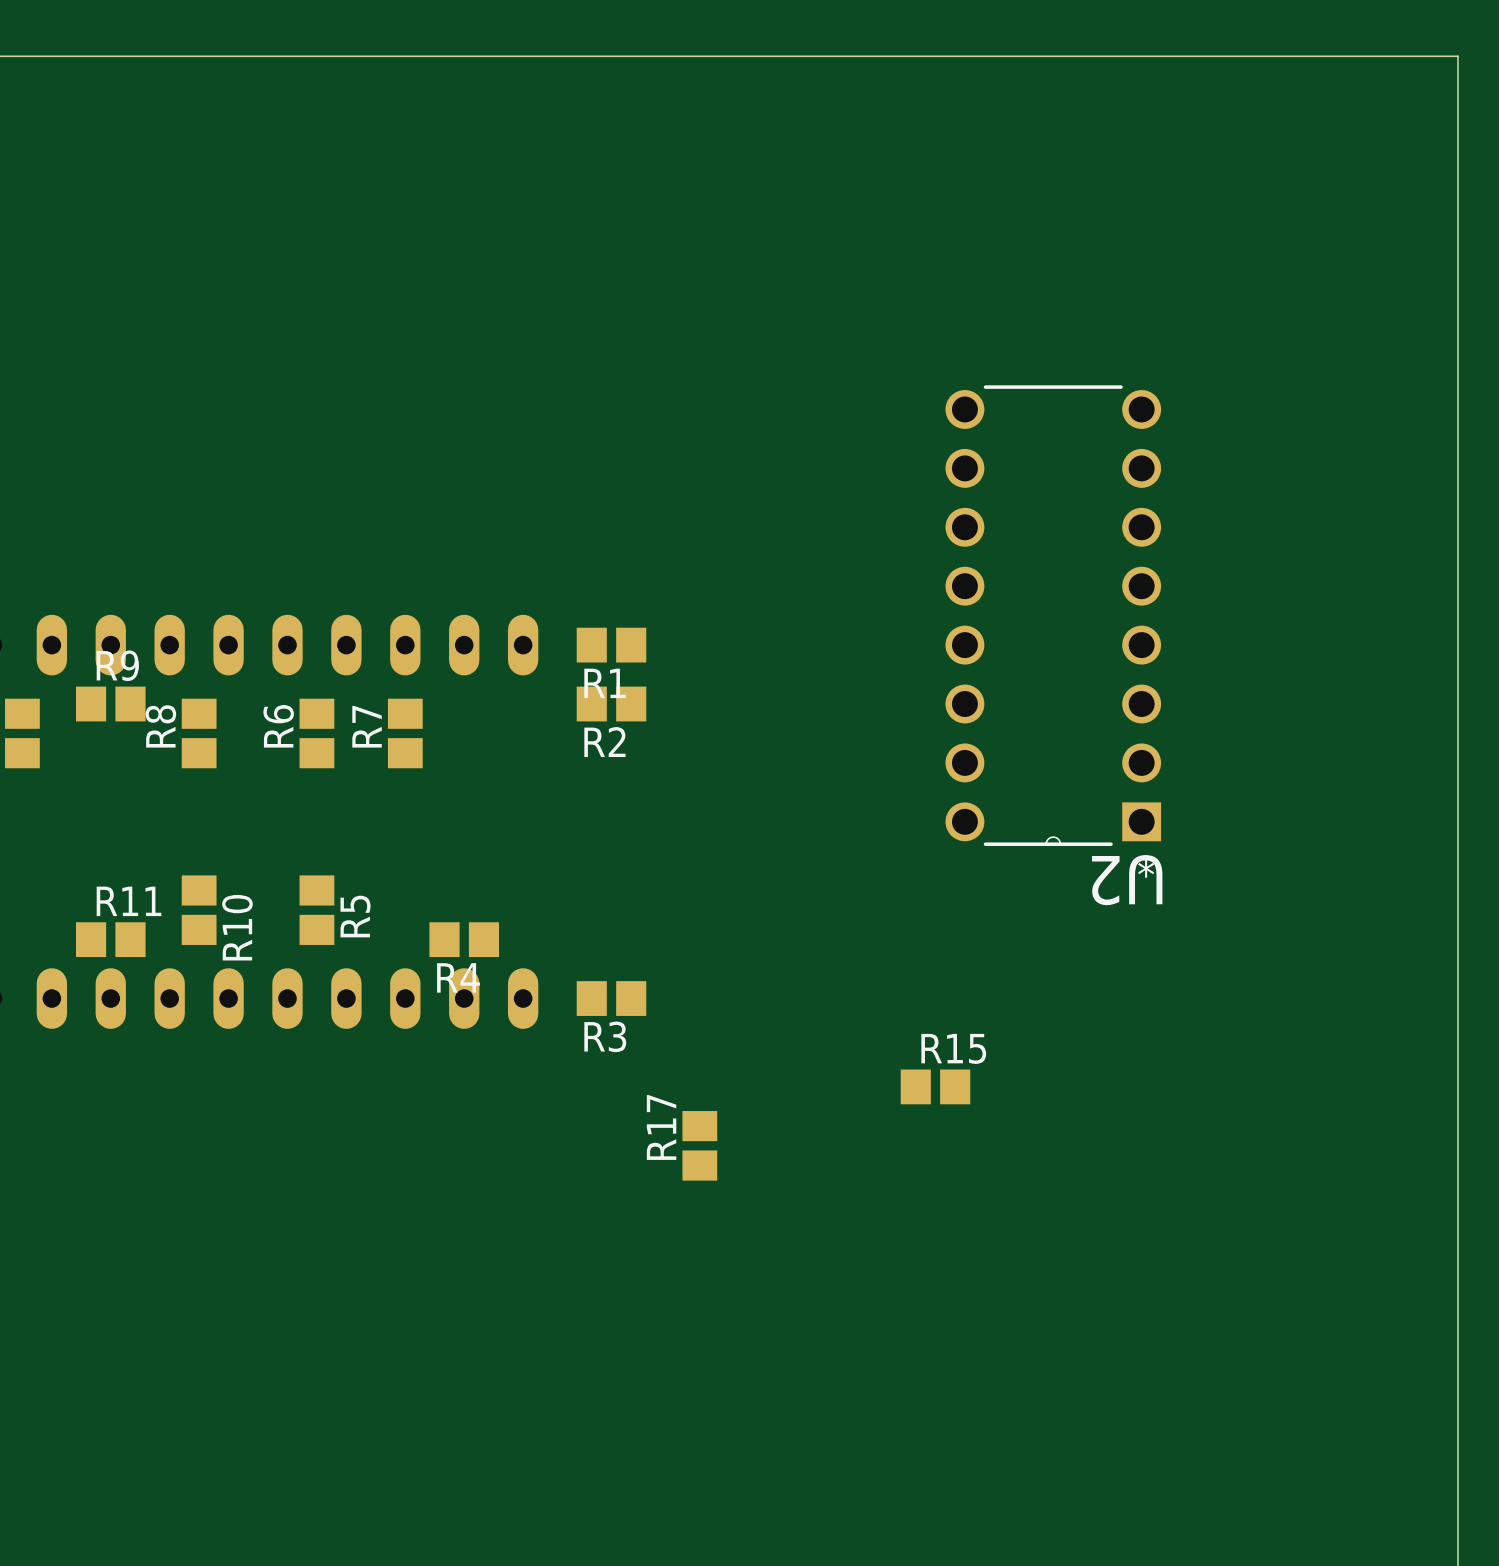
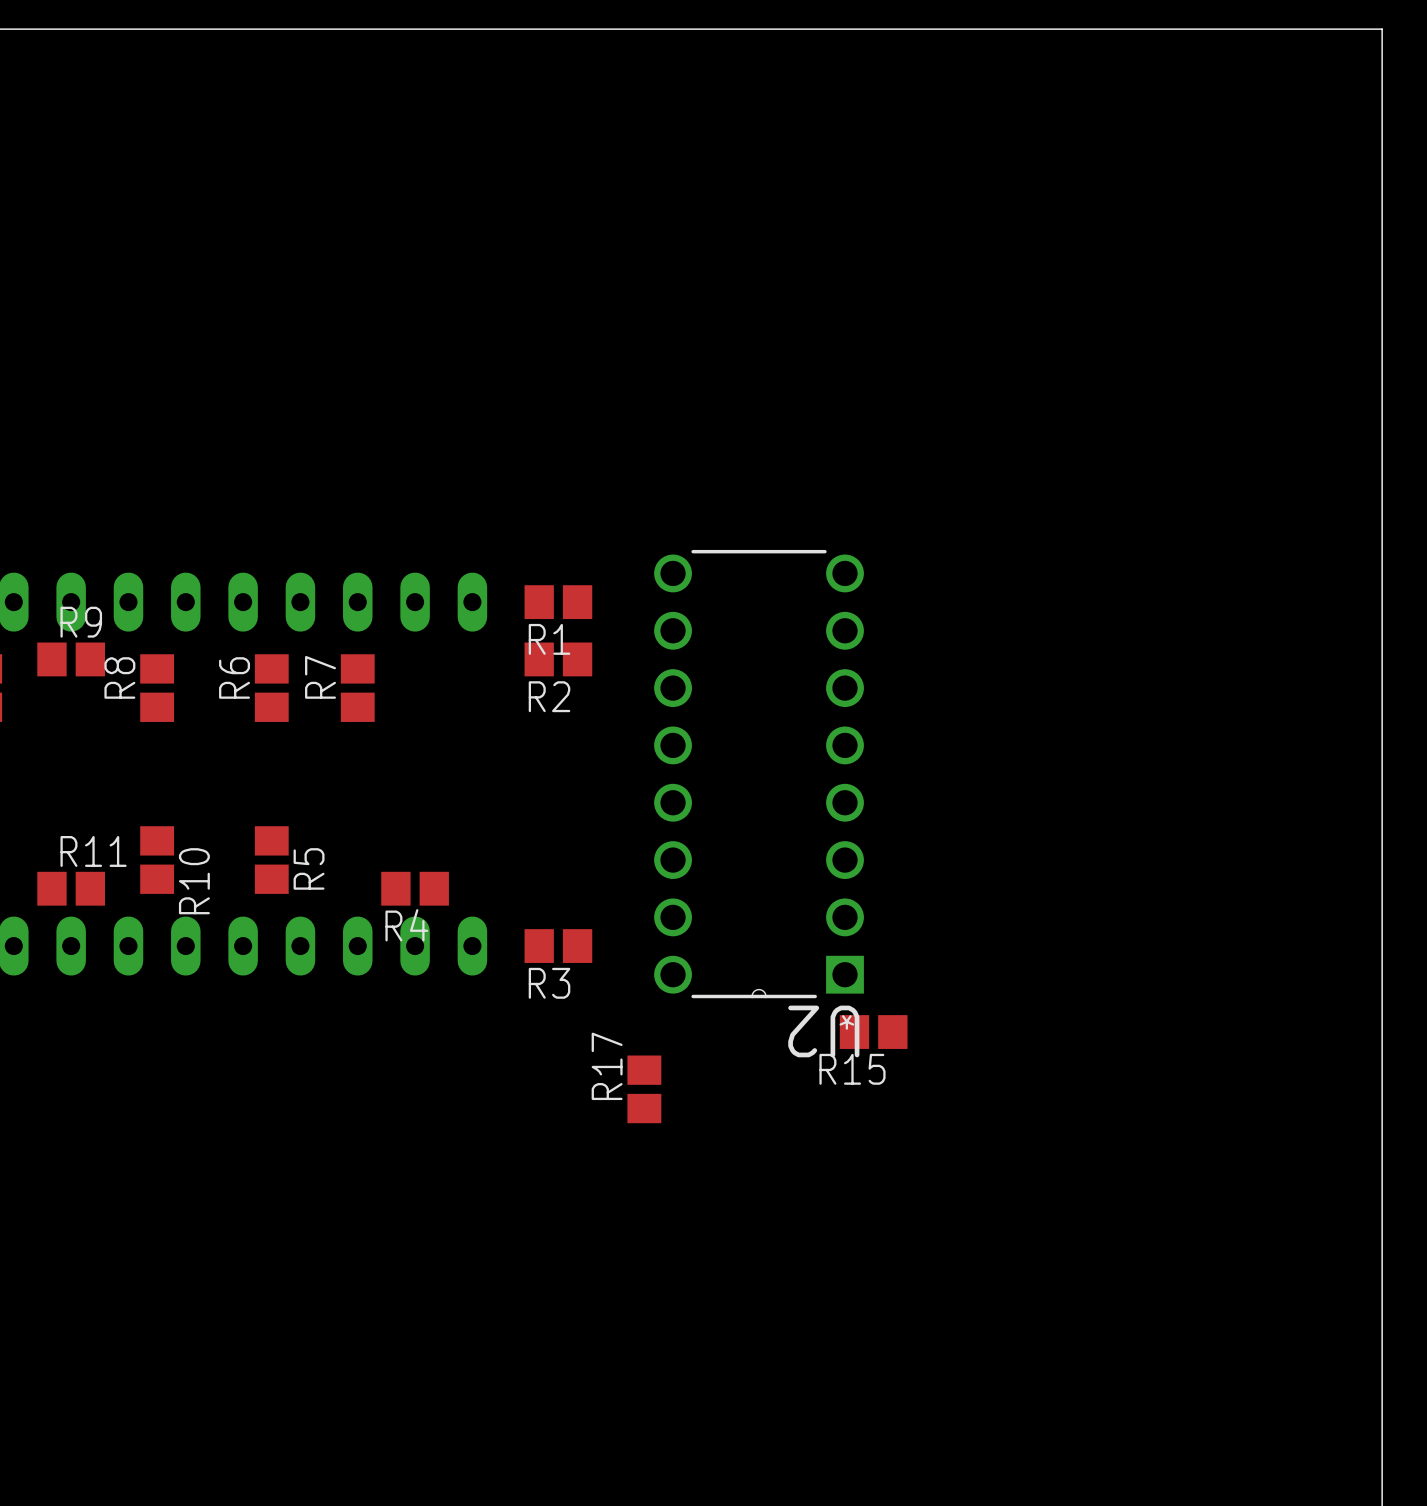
U2 position: (1053, 615) -> (759, 774)
R15 name position: R15 (953, 1048) -> R15 (852, 1069)

